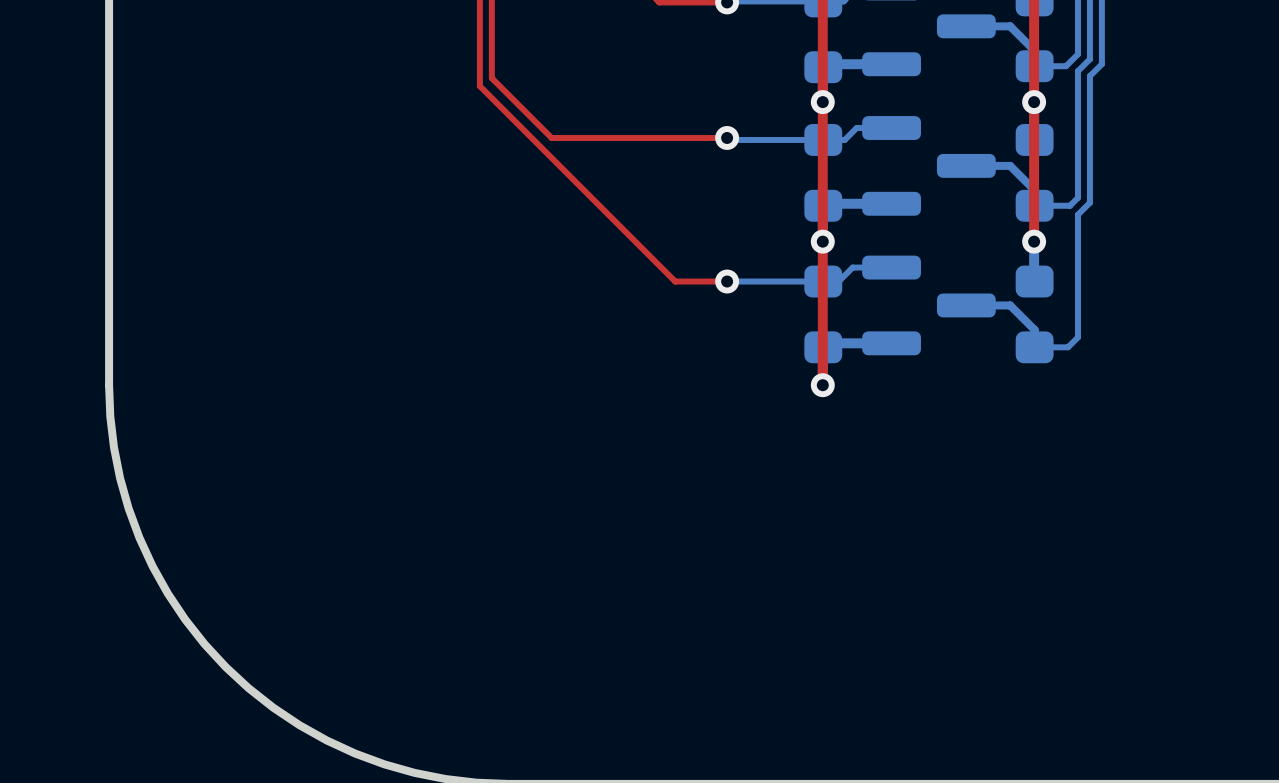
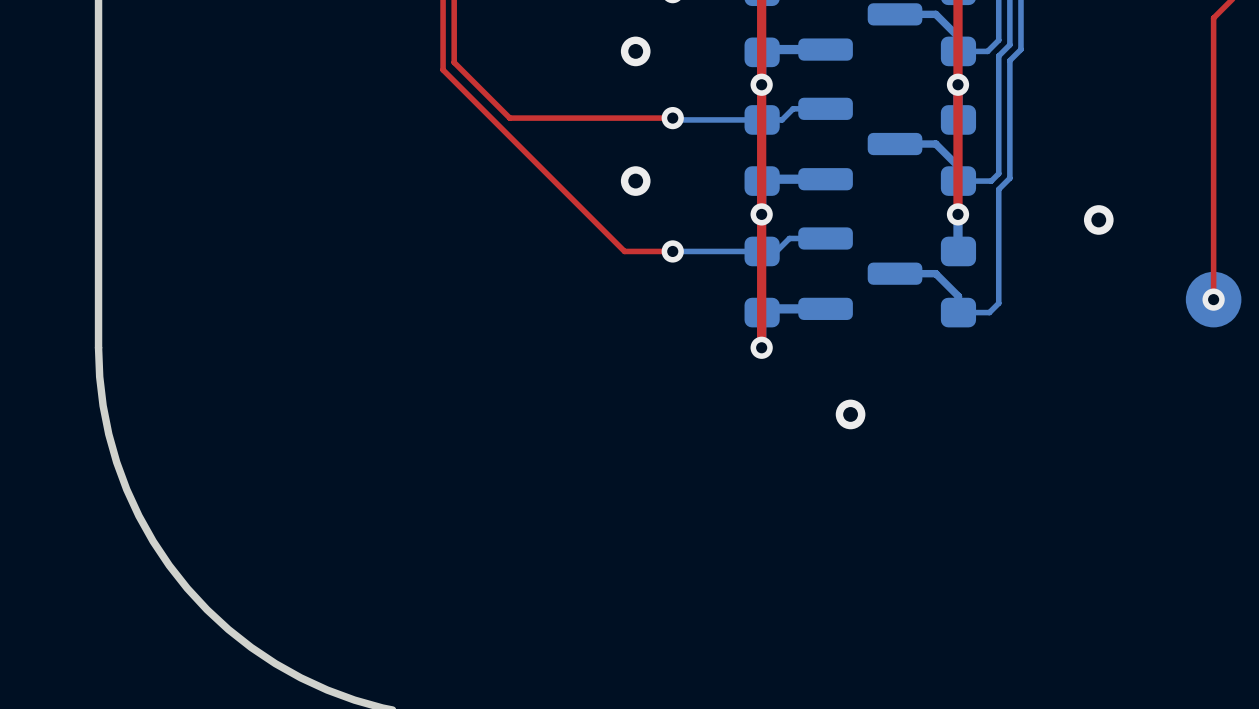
via: none -> (635, 51)
via: none -> (635, 181)
via: none -> (1098, 219)
via: none -> (850, 414)

